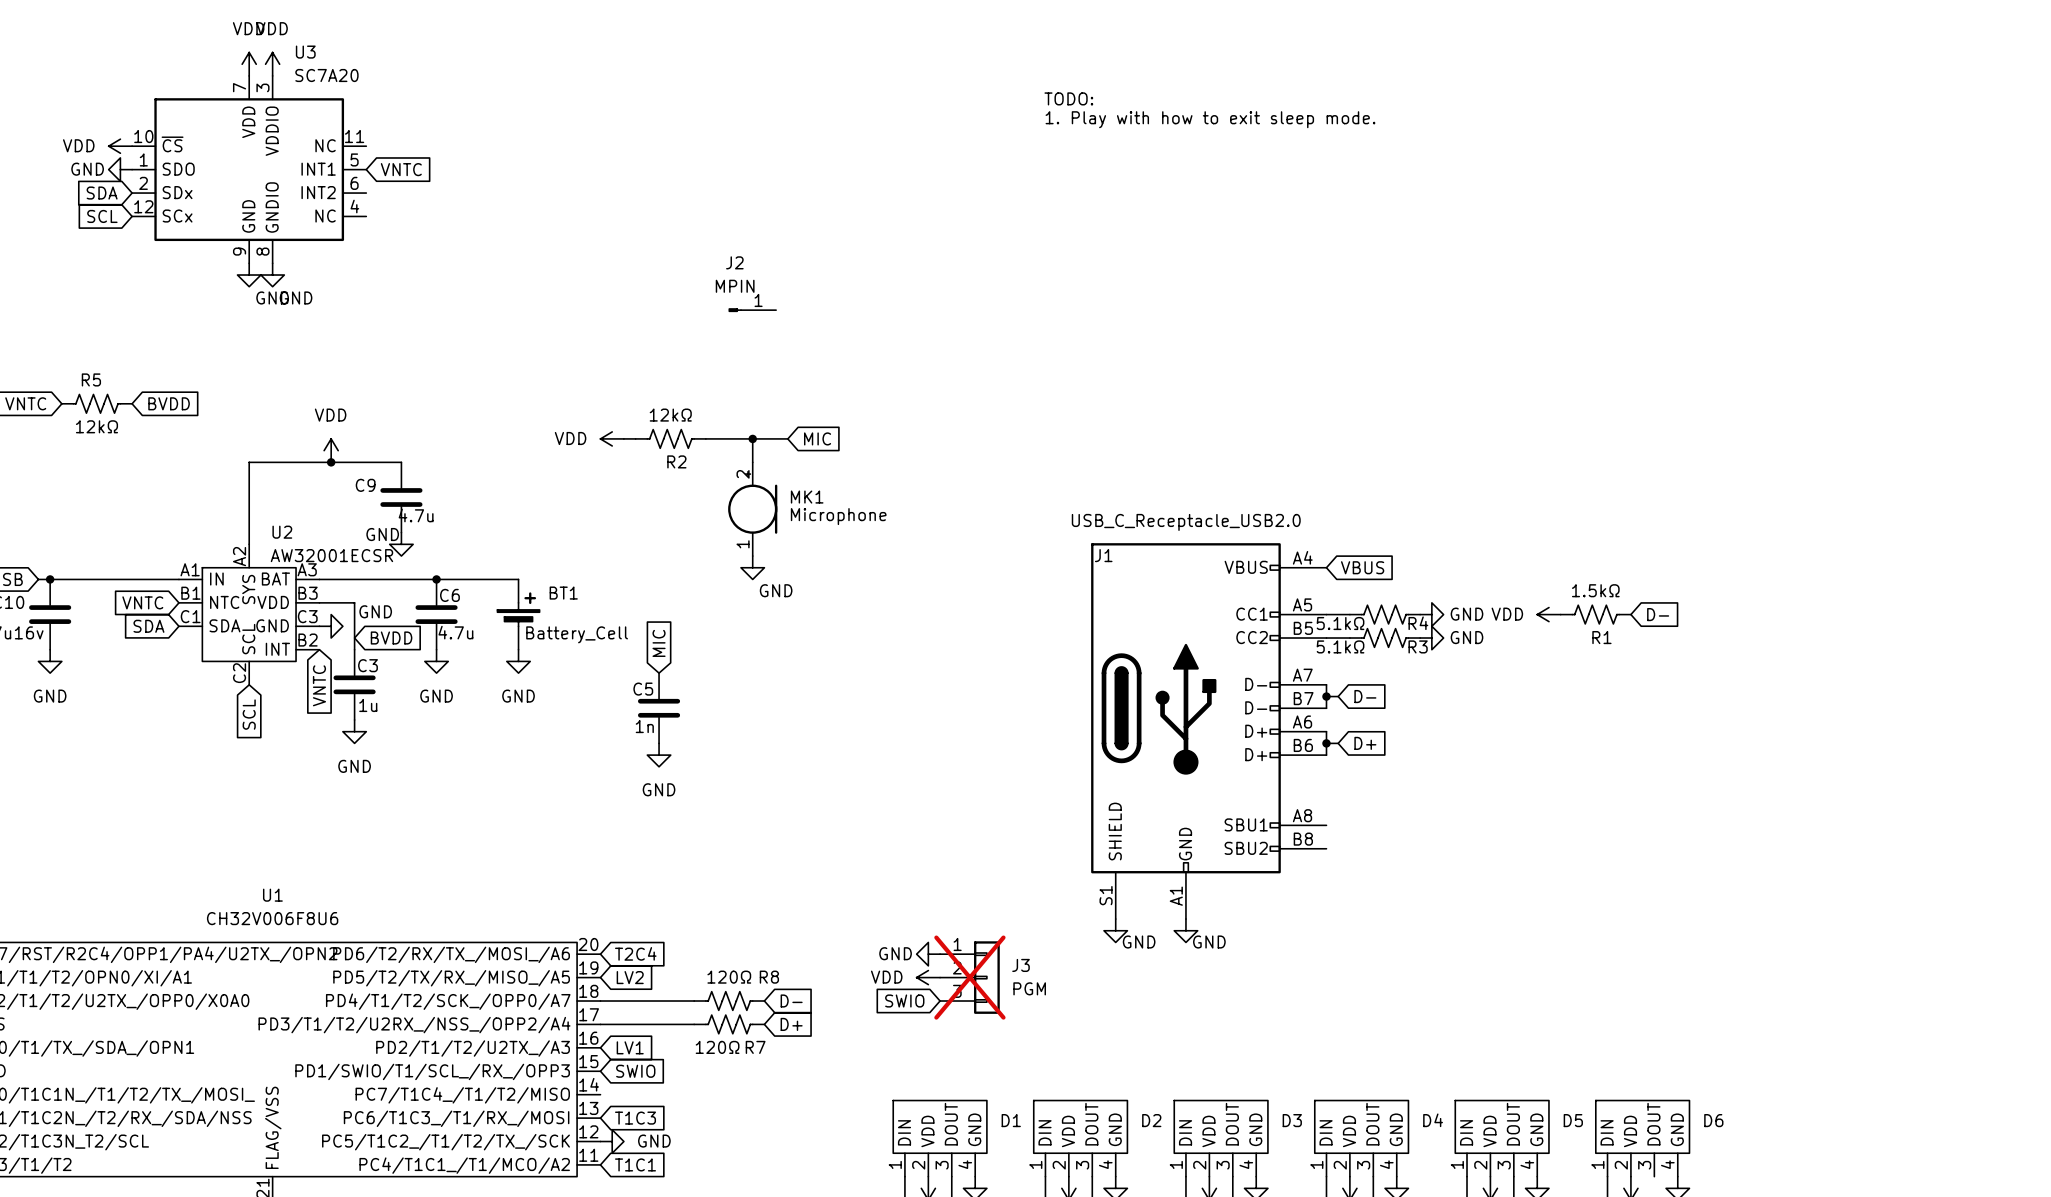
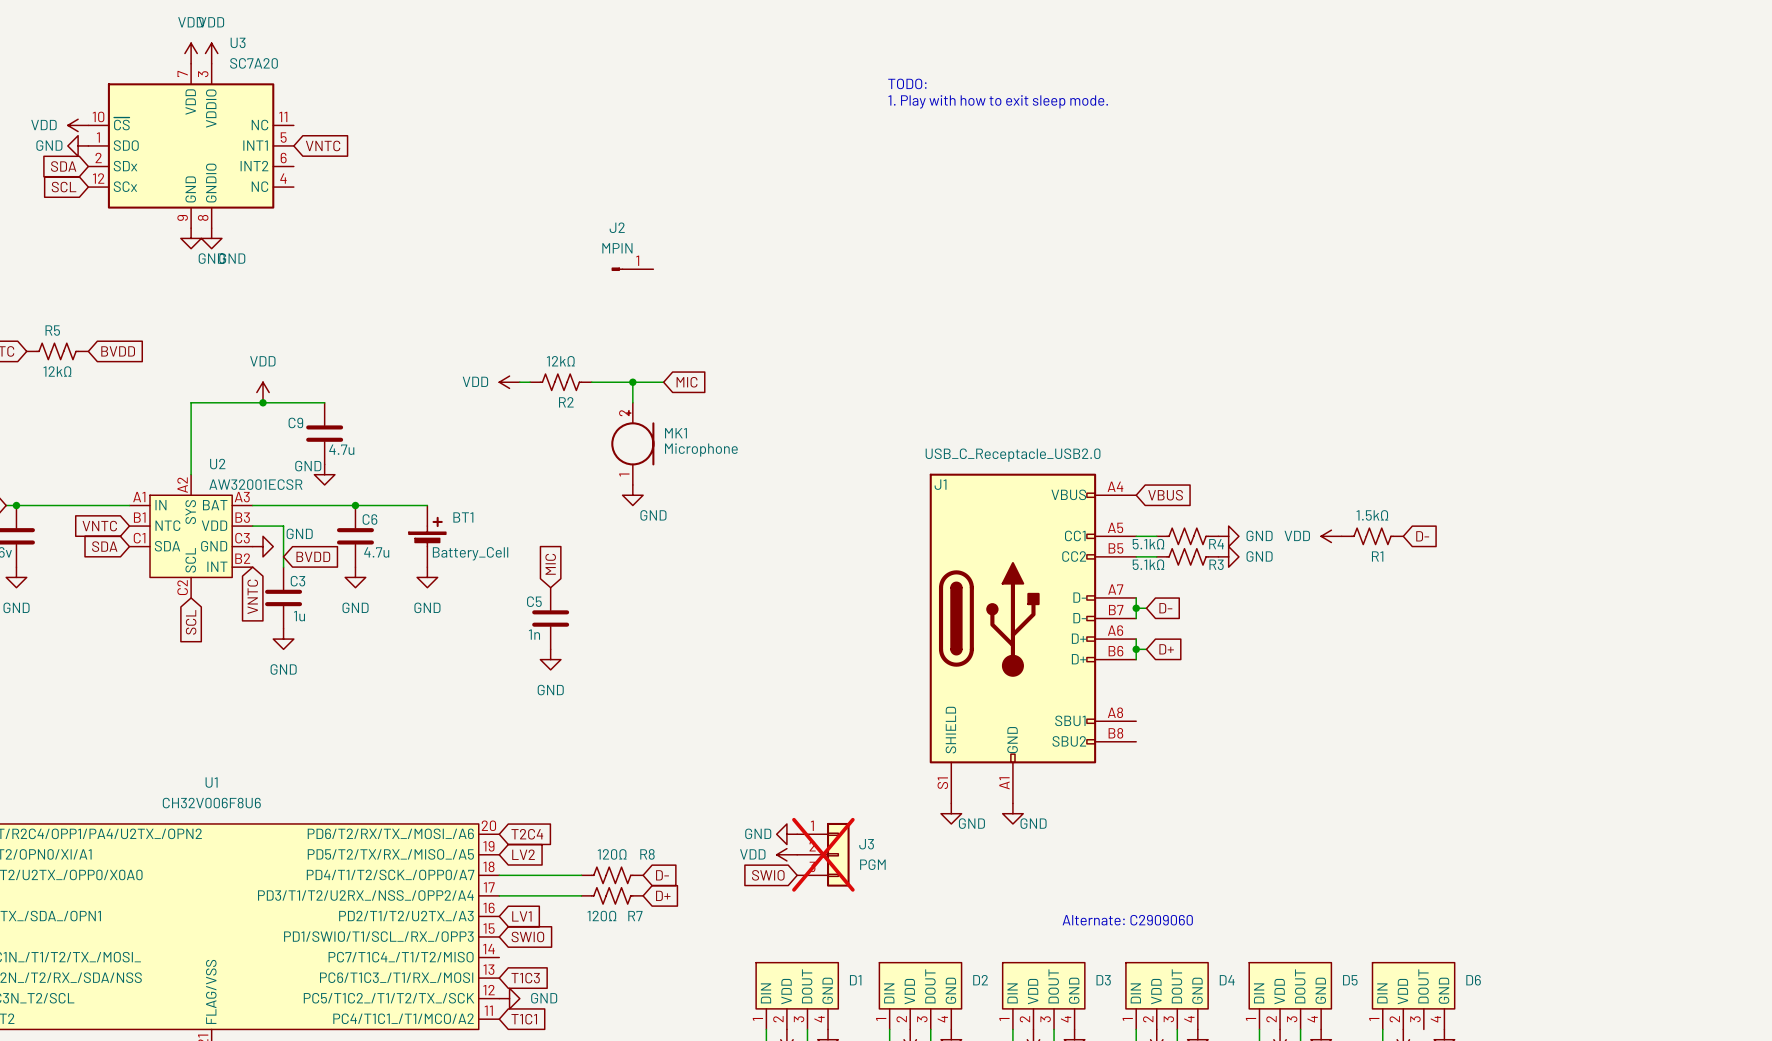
text: none -> Alternate: C2909060 (1127, 920)

